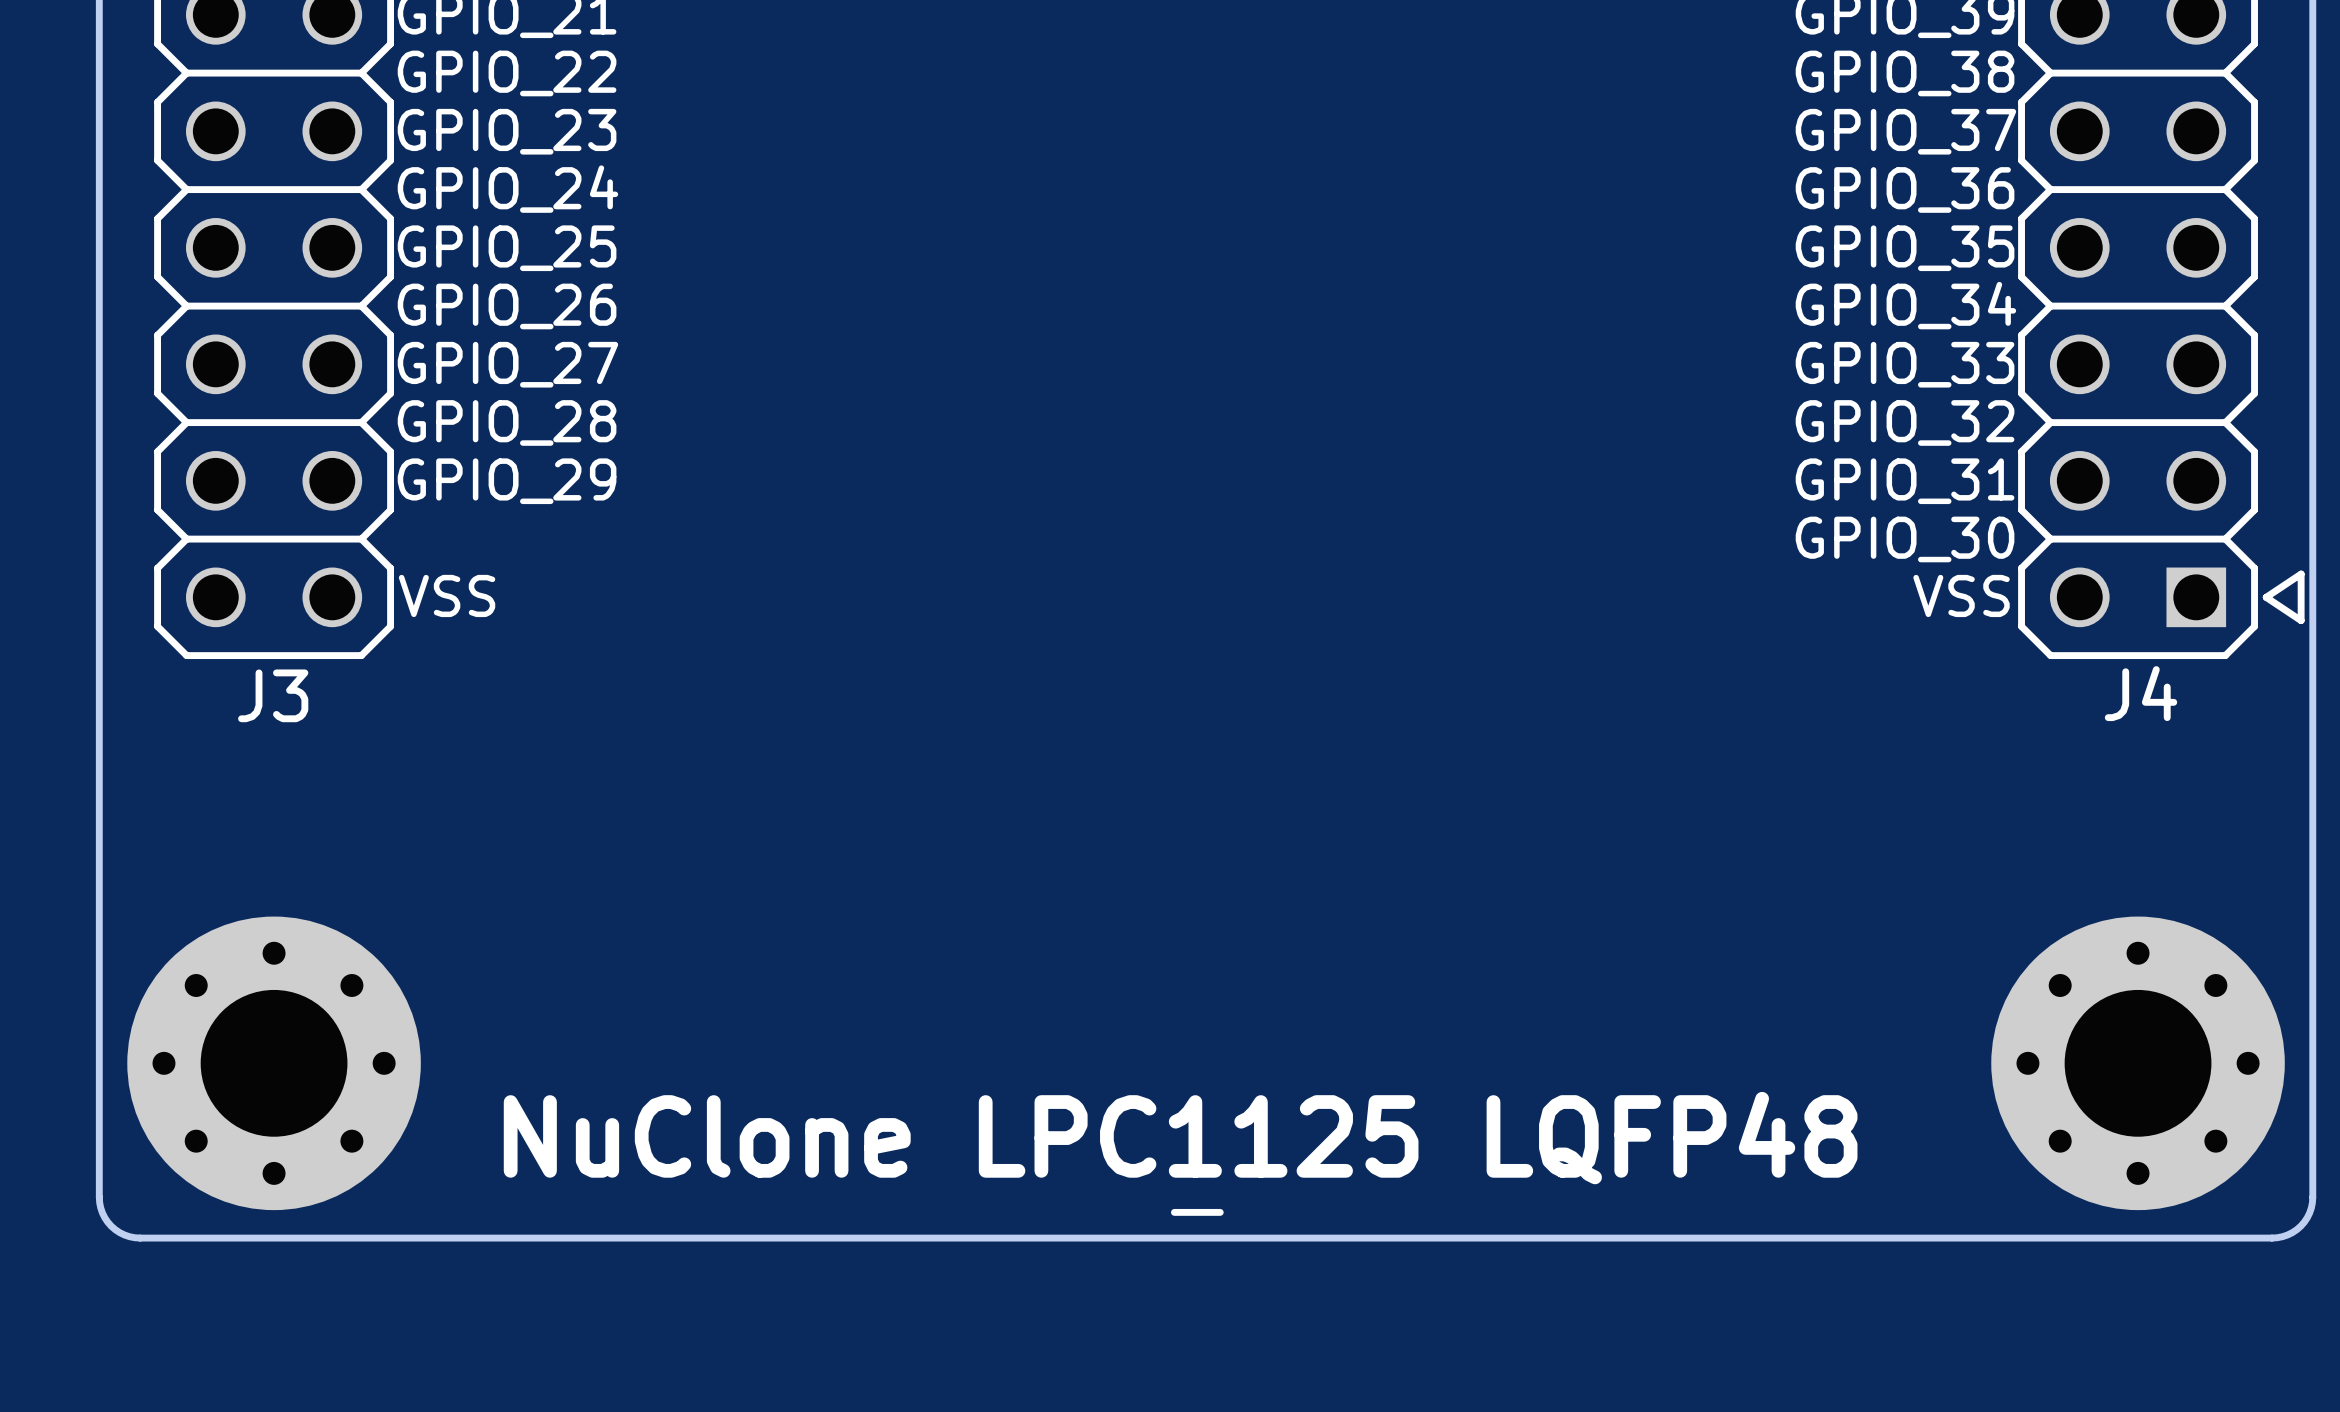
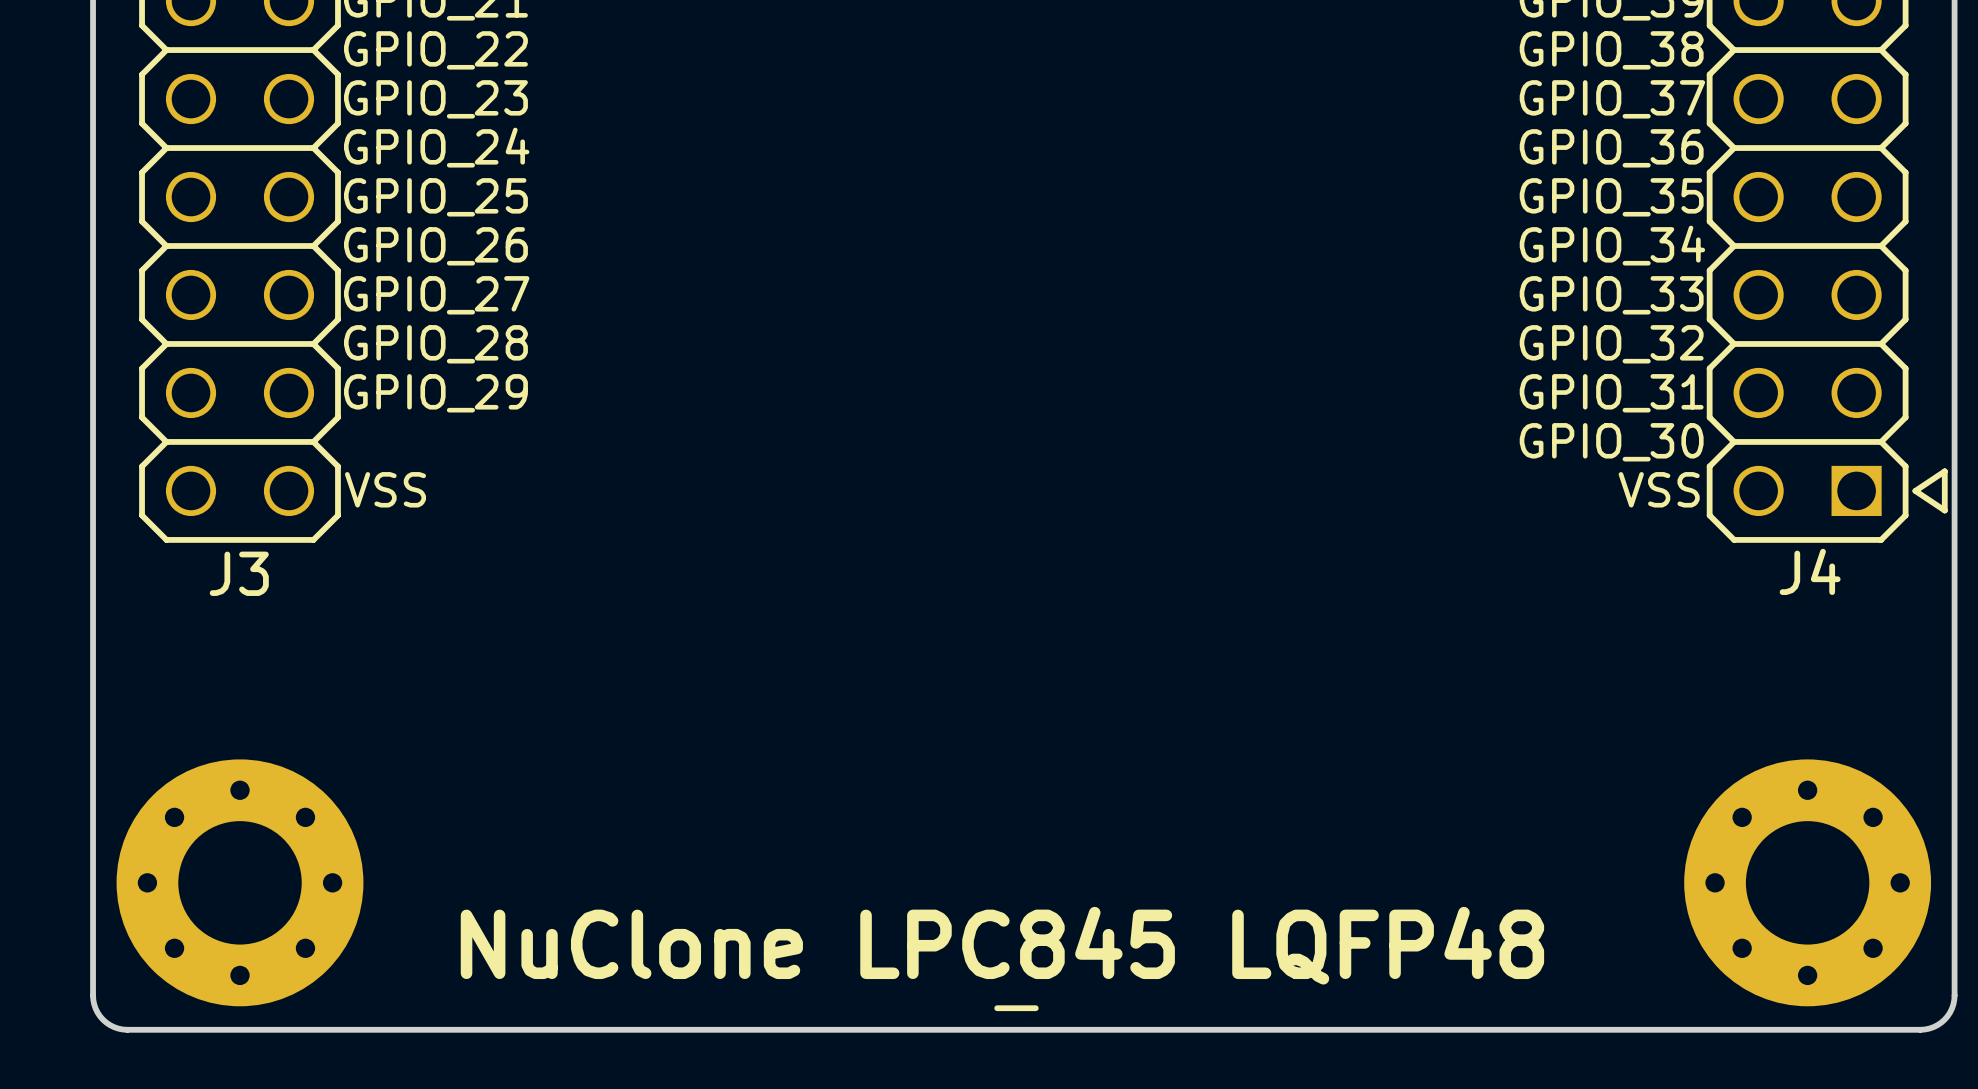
drawing shape: [503, 1091, 1858, 1216] -> [460, 906, 1545, 1012]

